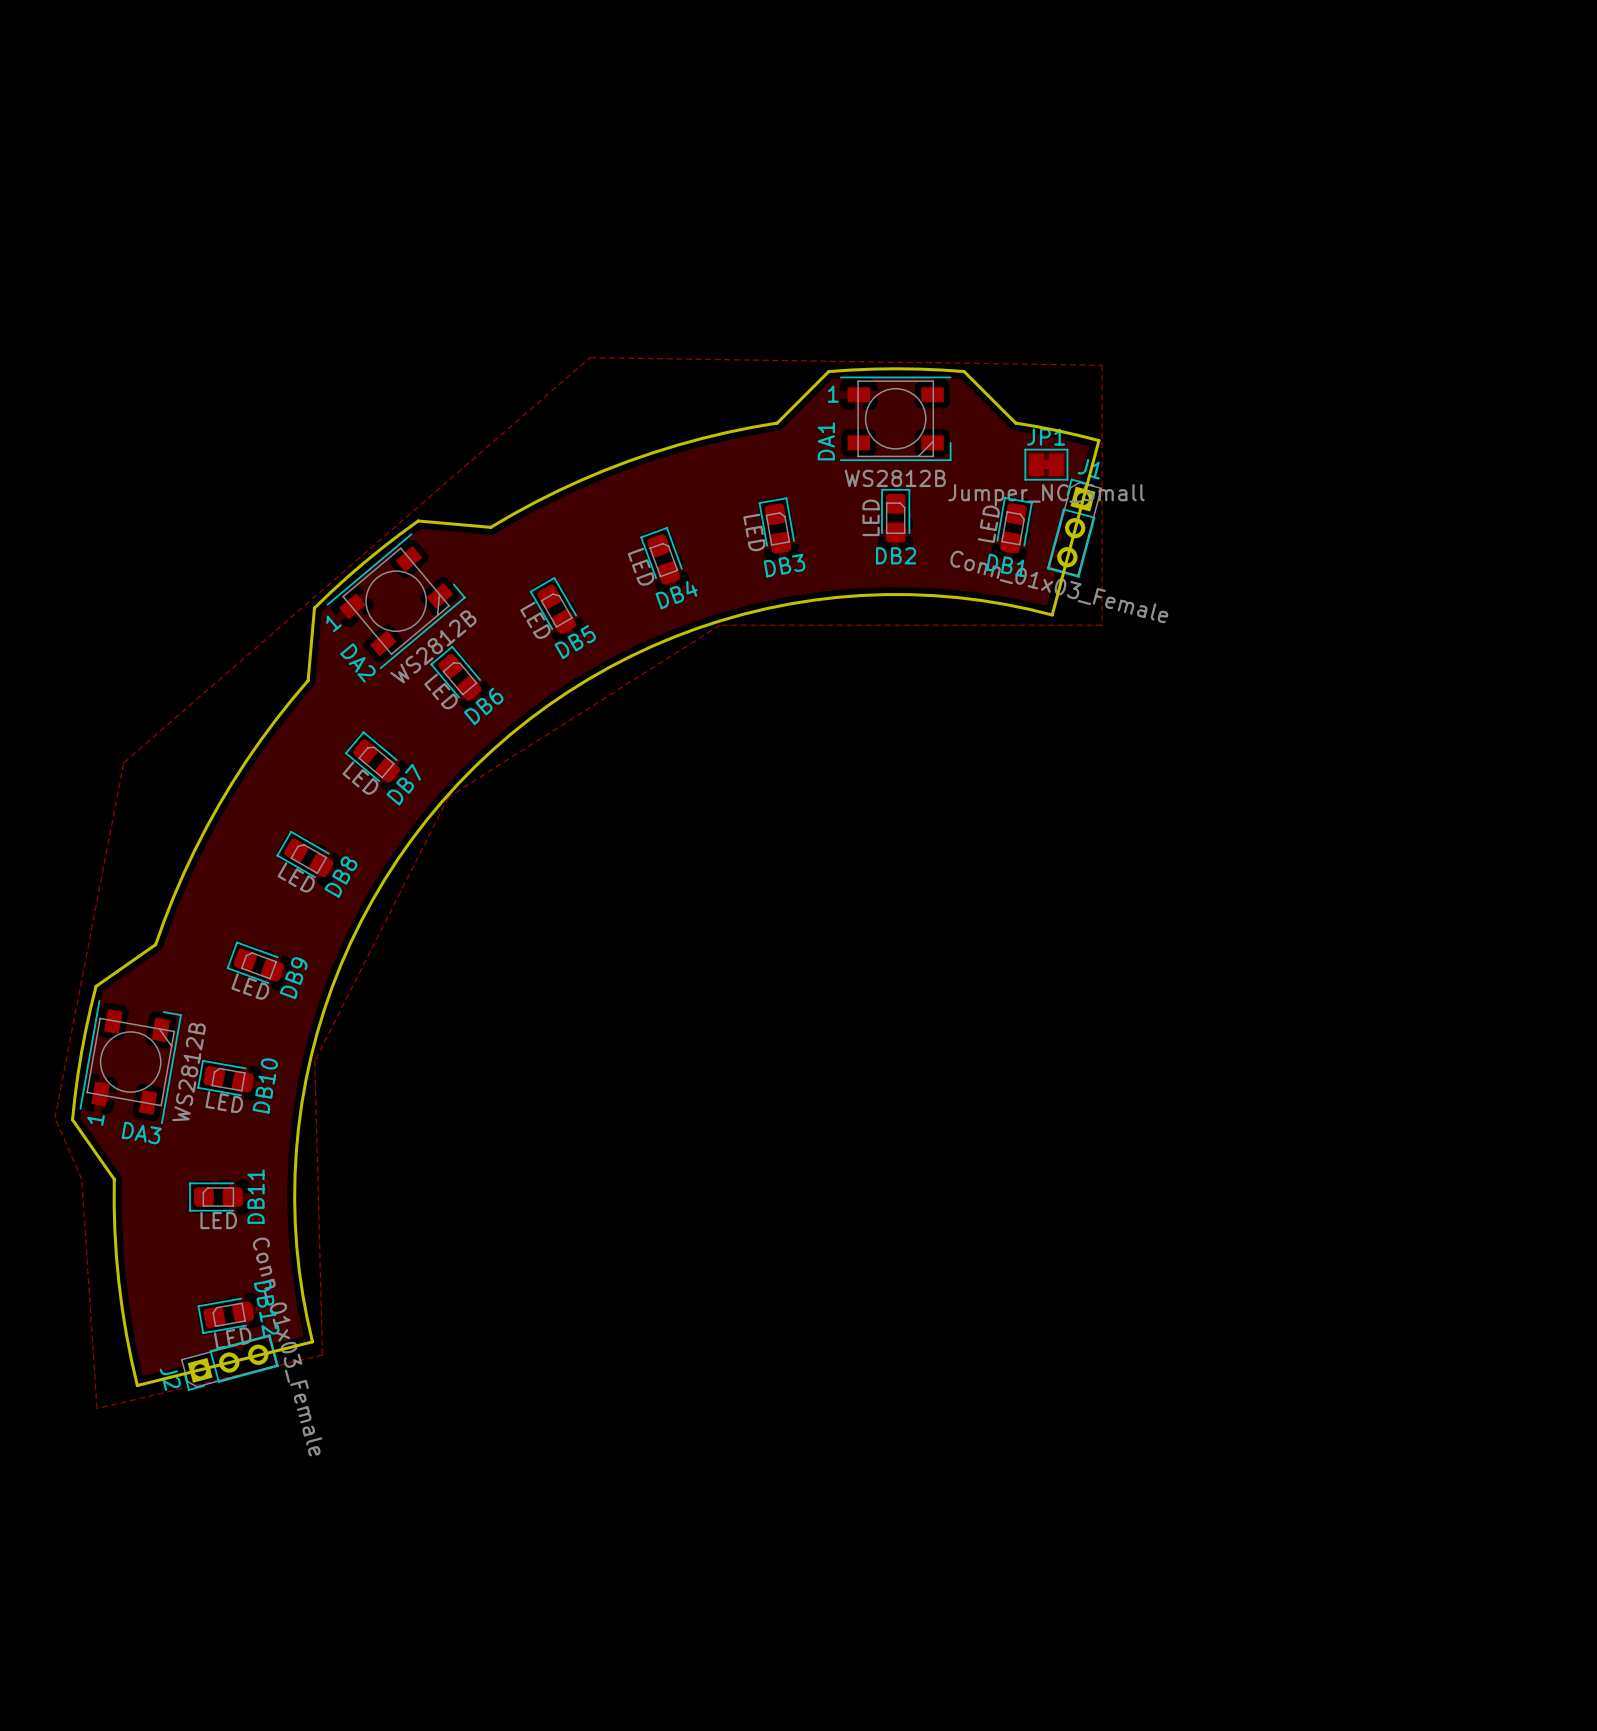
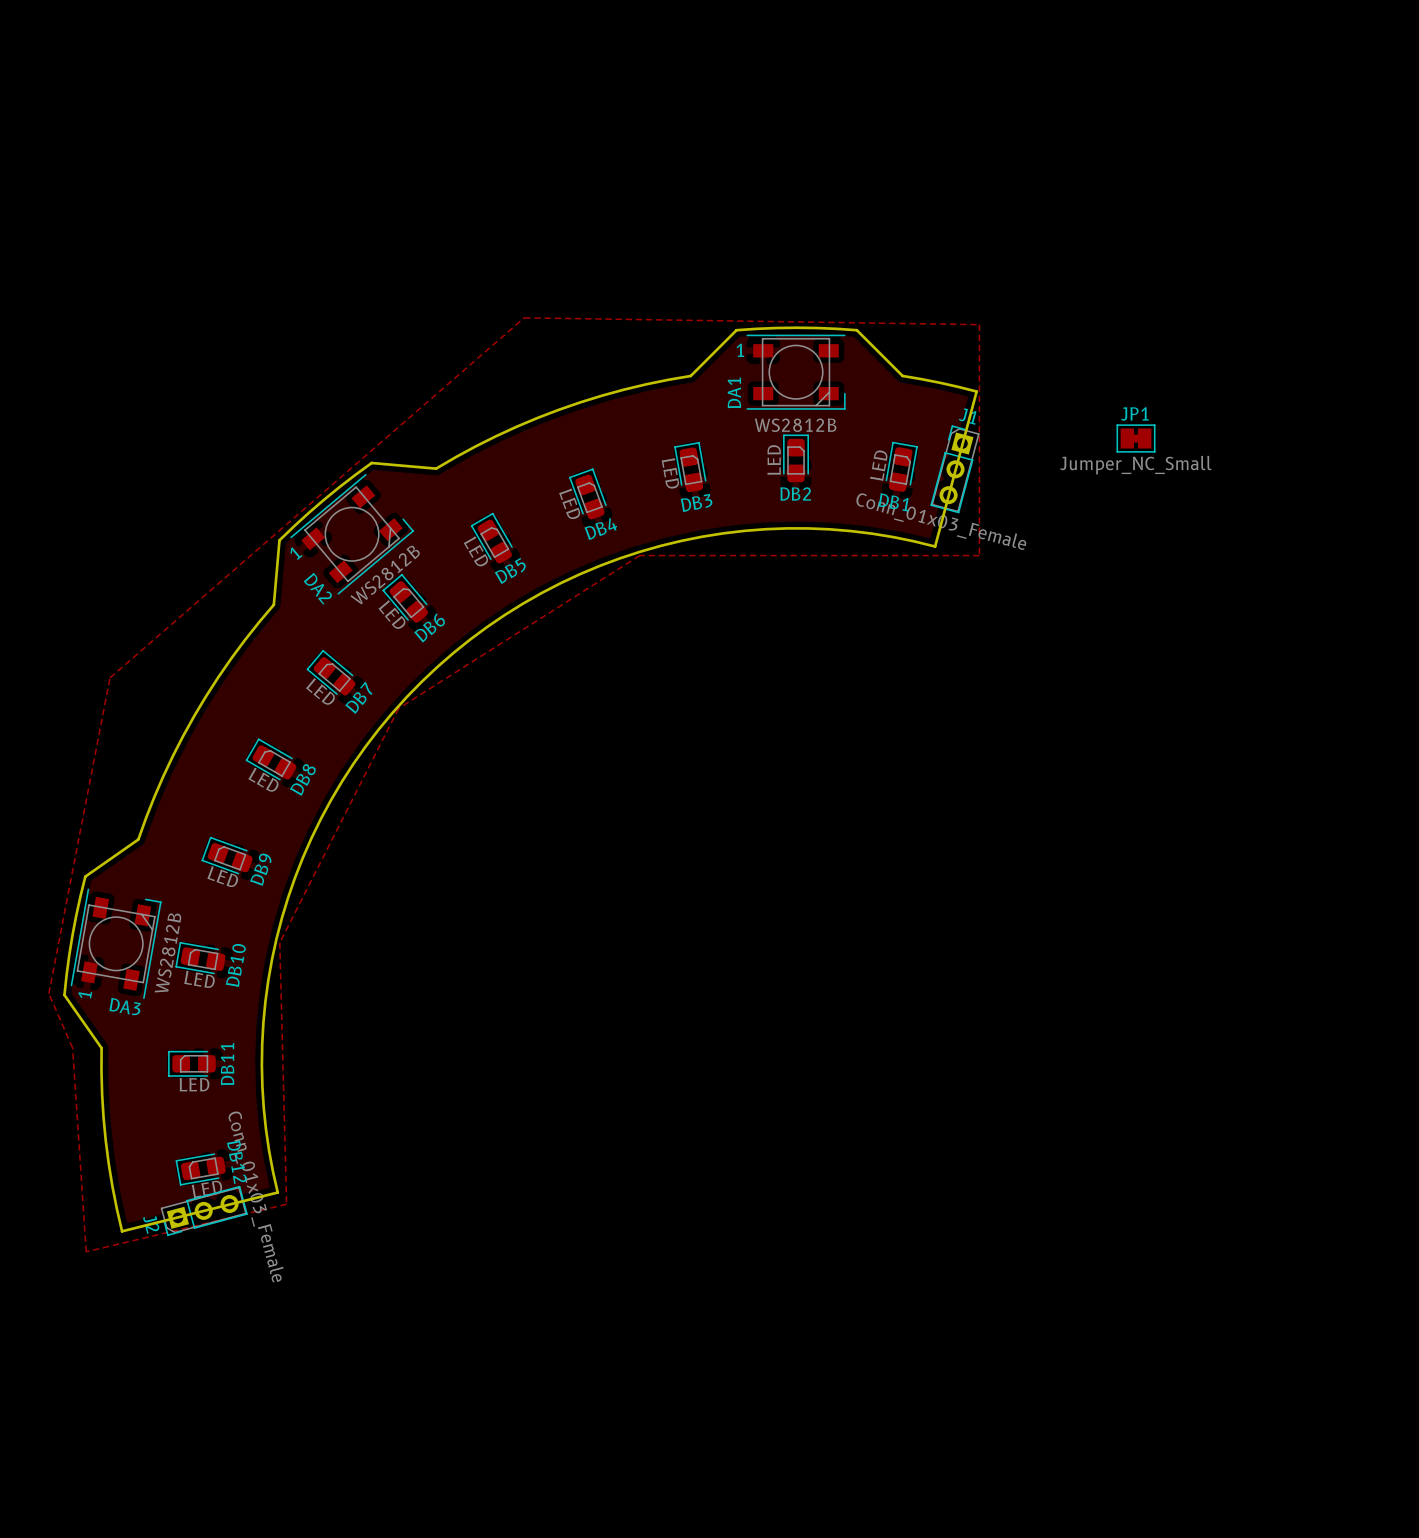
JP1 position: (1046, 464) -> (1136, 438)

